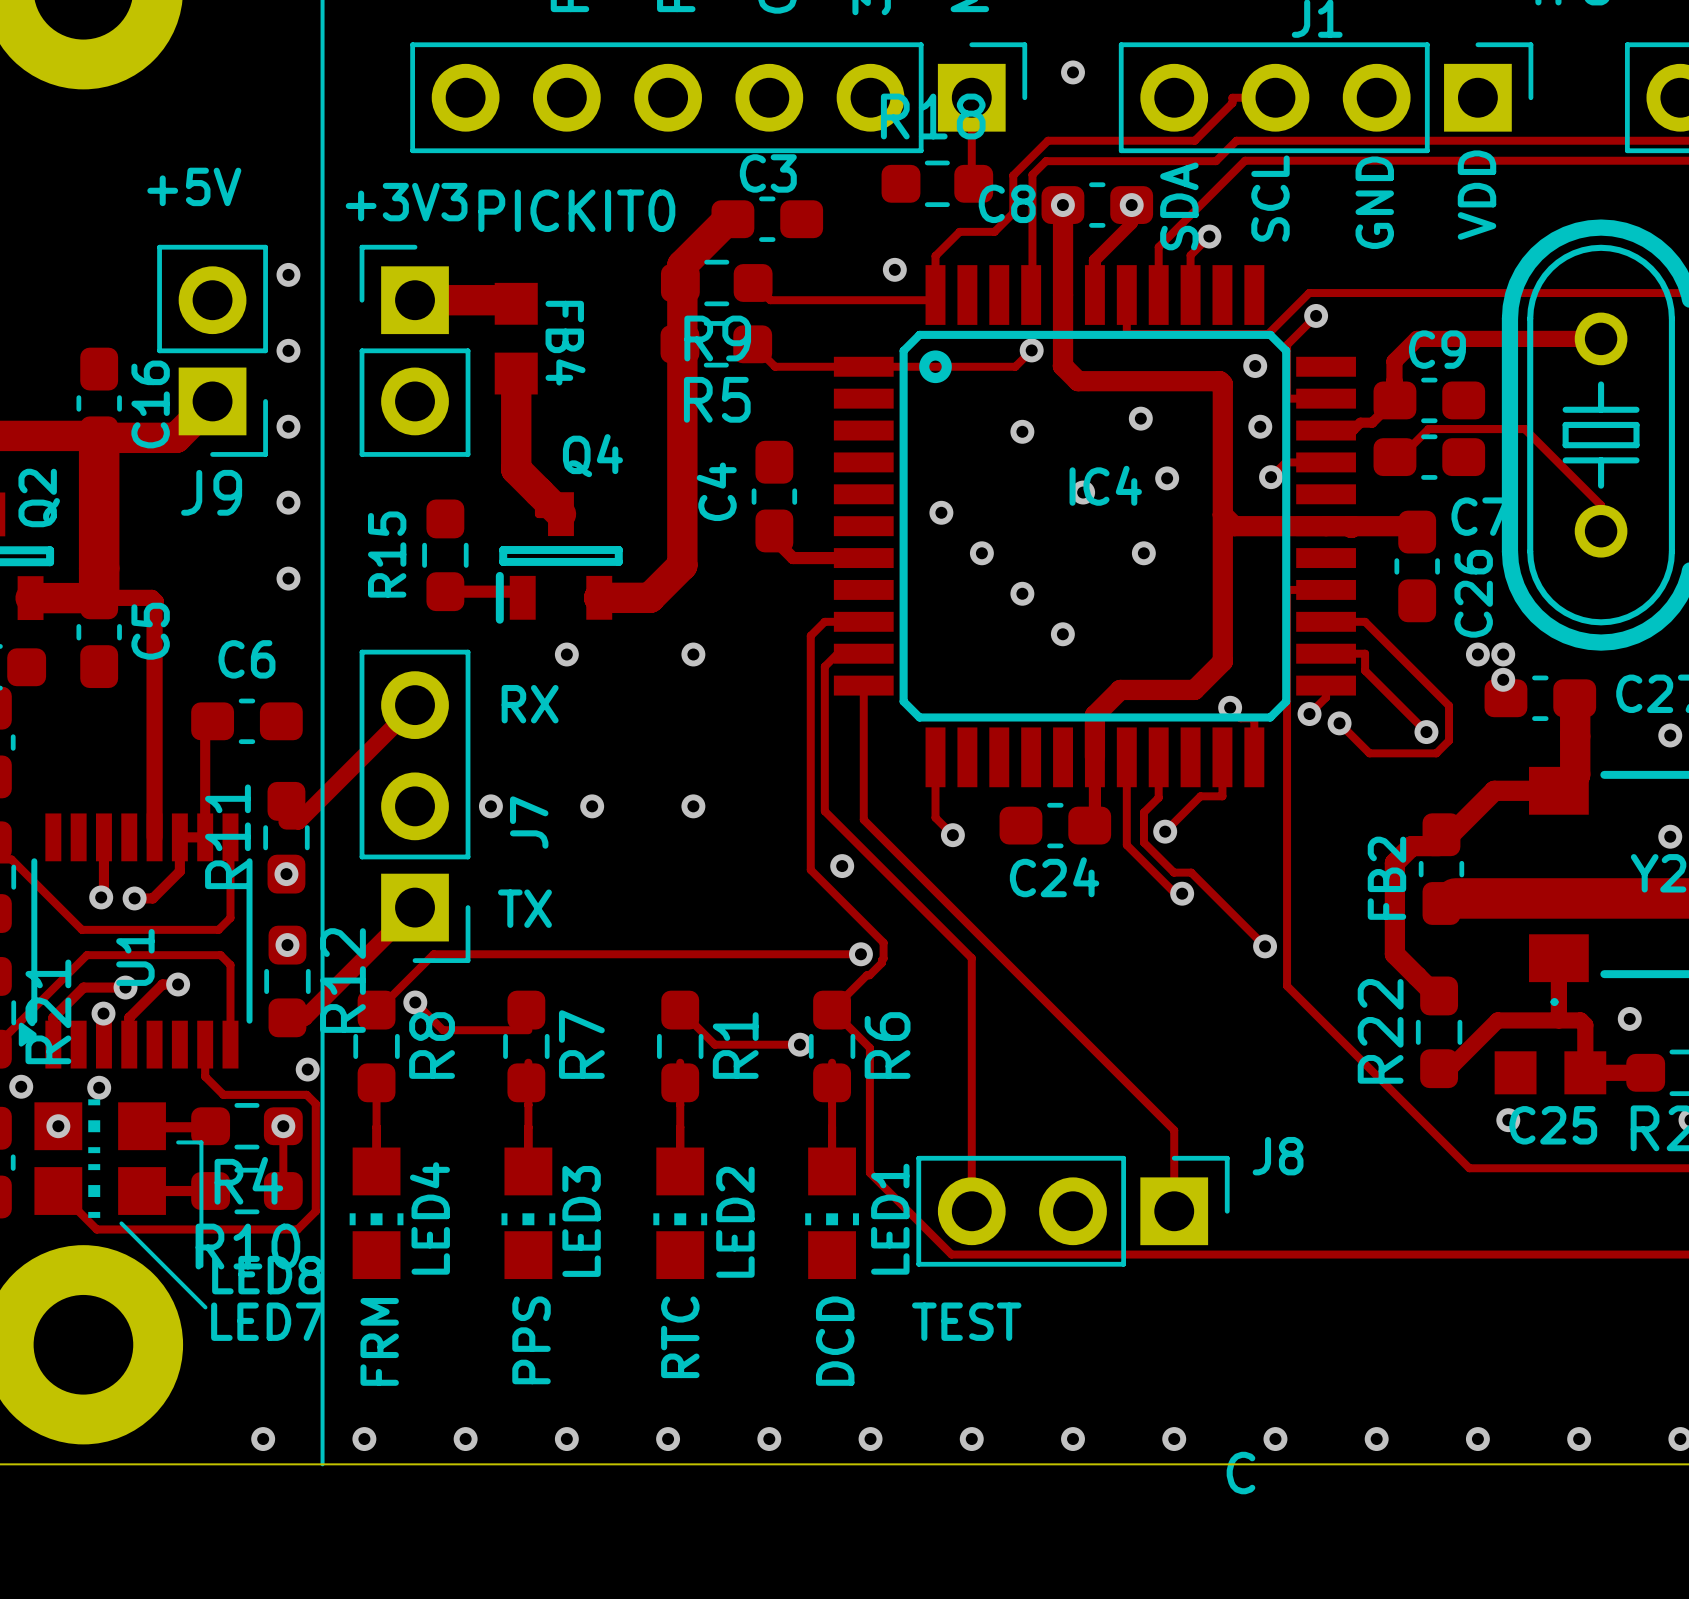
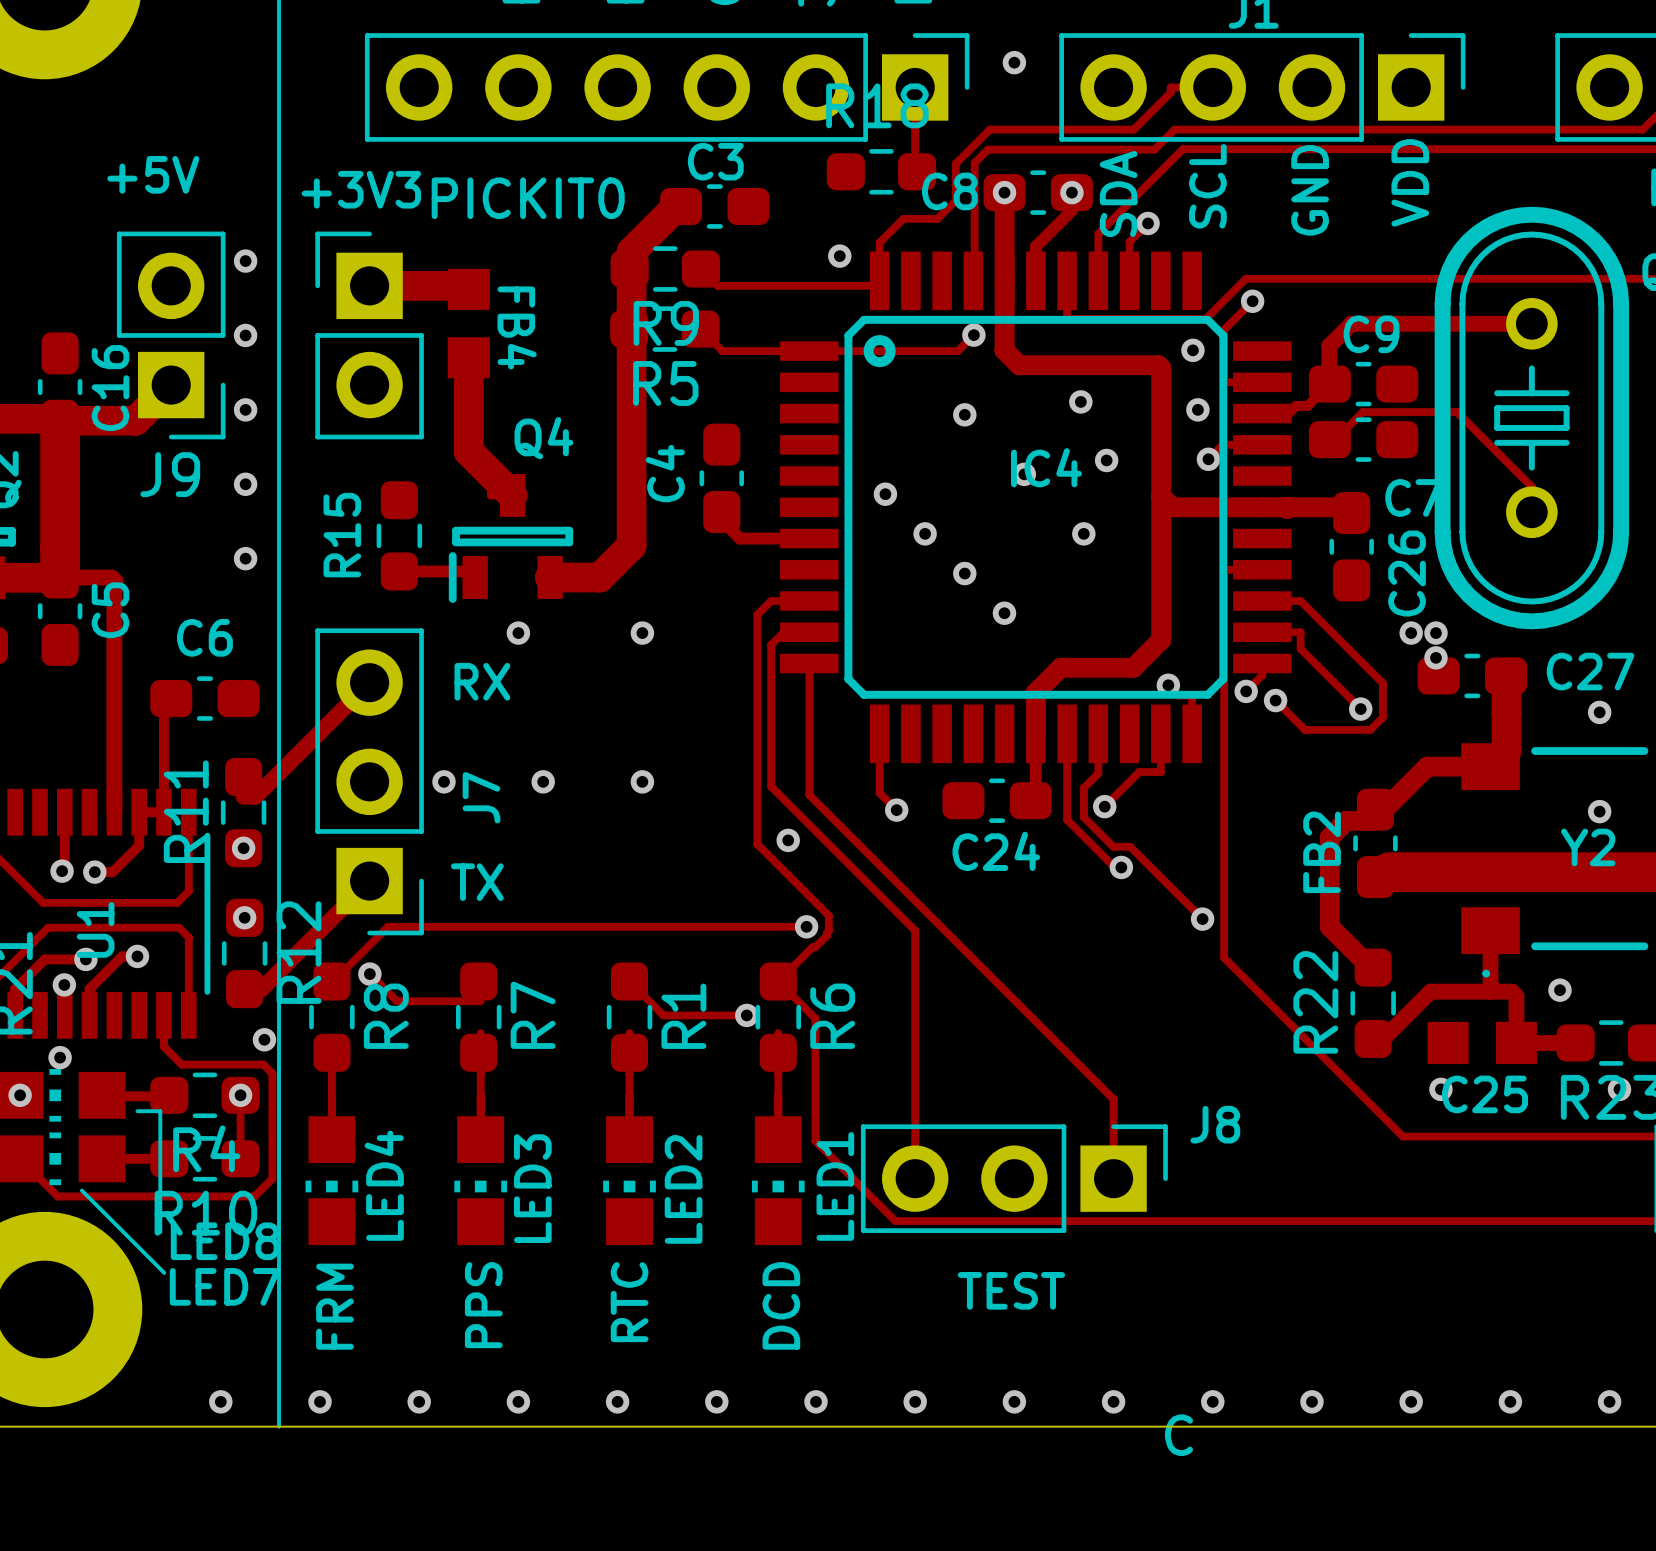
text position: TEST (966, 1321) -> TEST (1011, 1290)

